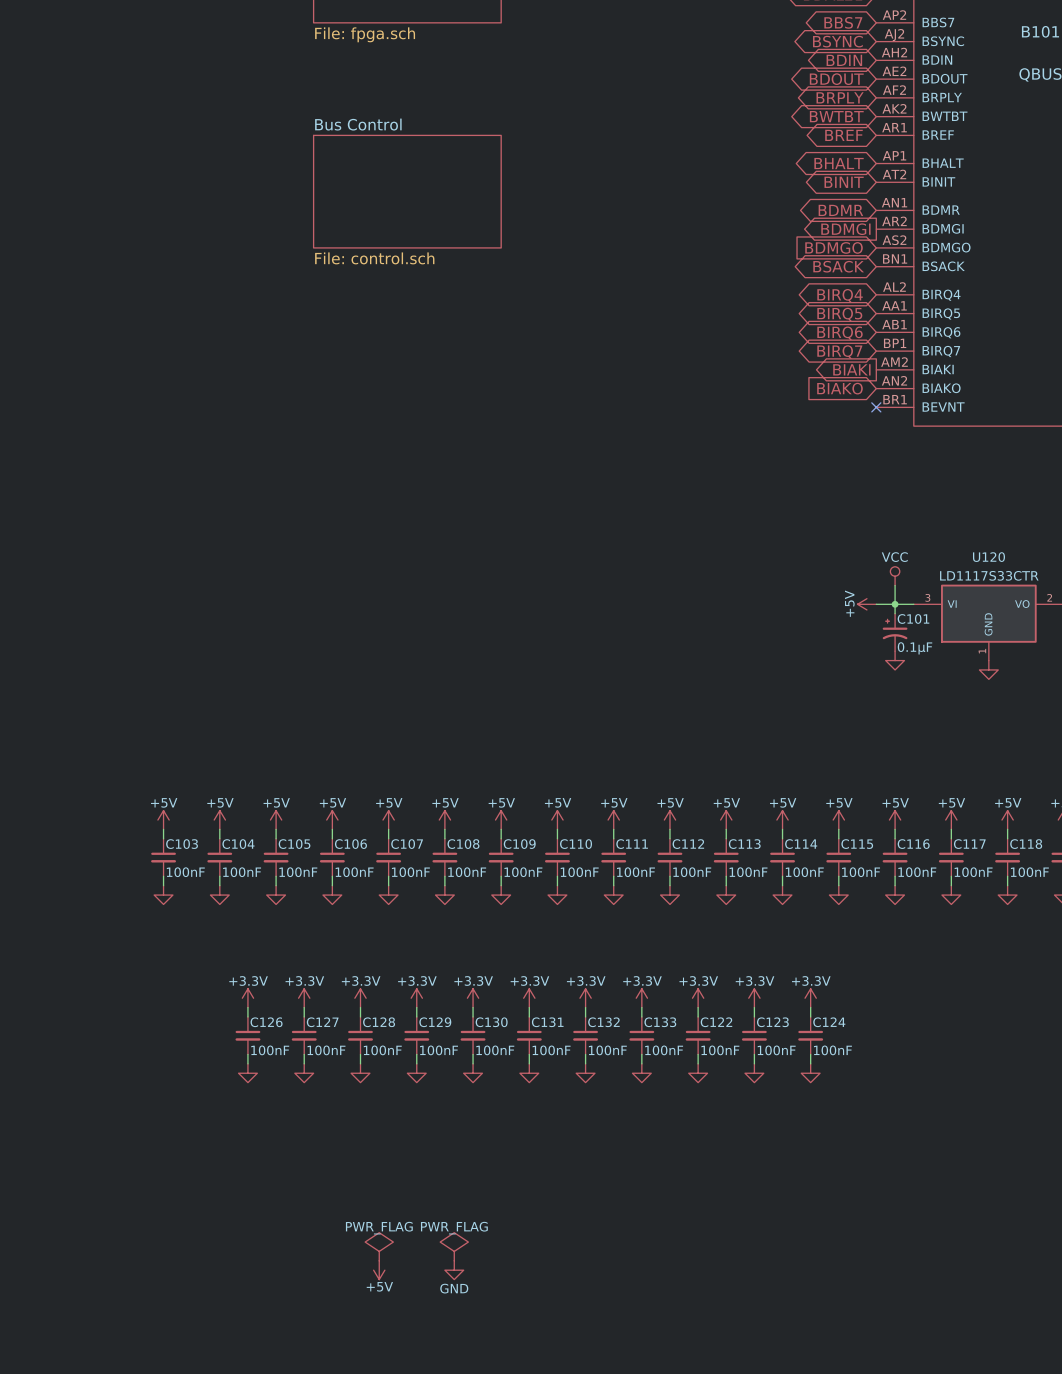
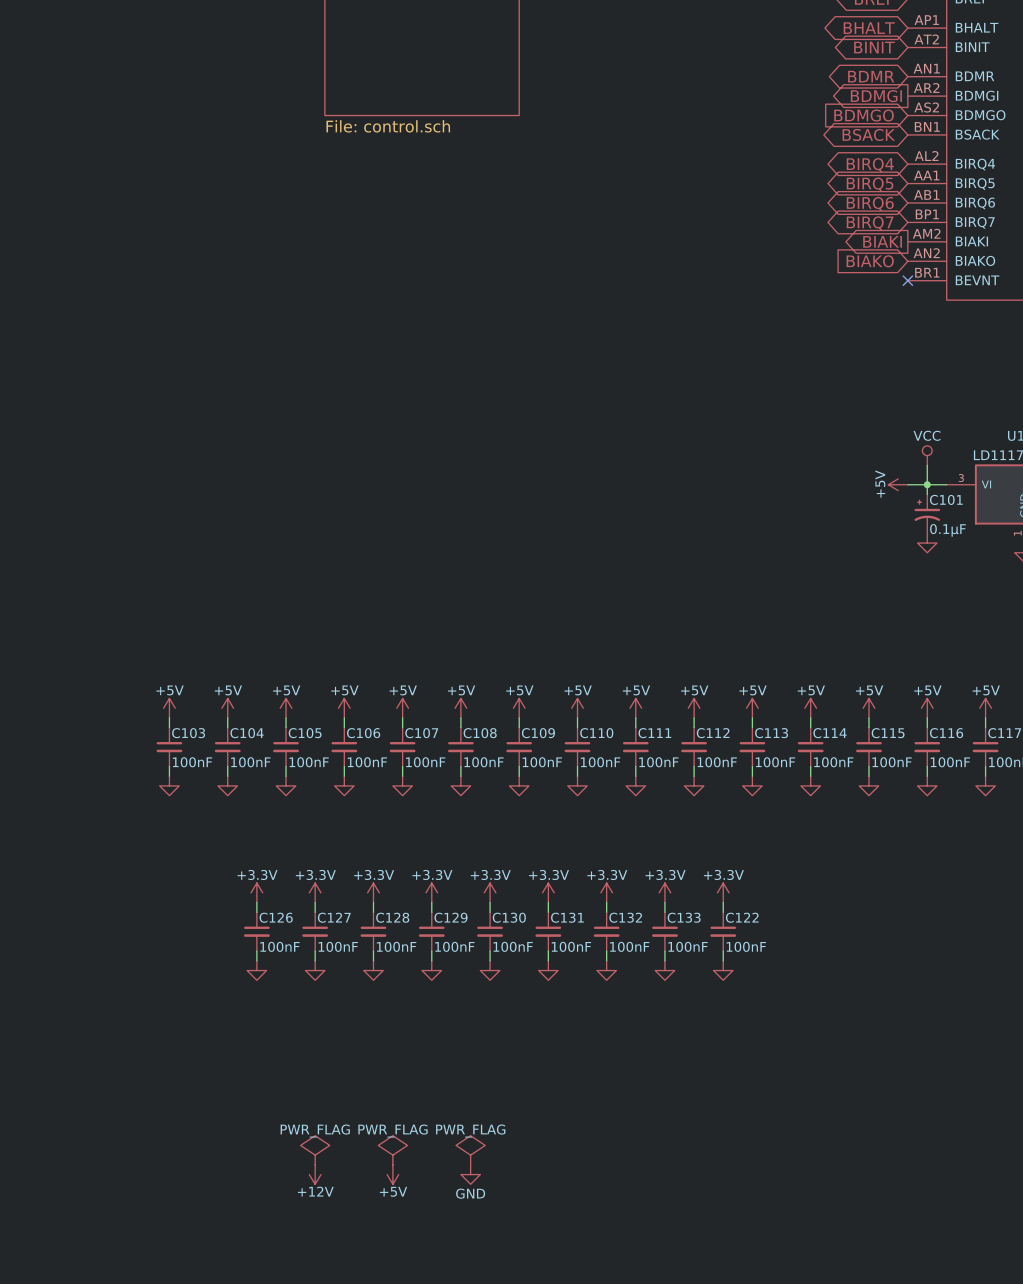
power symbol: +3.3V (754, 998) -> none
power symbol: +3.3V (810, 998) -> none
wire: (754, 1007) (754, 1016) -> none
wire: (810, 1007) (810, 1016) -> none
C123: 100nF (754, 1035) -> none
C124: 100nF (810, 1035) -> none
wire: (754, 1054) (754, 1063) -> none
wire: (810, 1054) (810, 1063) -> none
power symbol: (754, 1073) -> none
power symbol: (810, 1073) -> none
power symbol: none -> PWR_FLAG (315, 1150)
power symbol: none -> +12V (315, 1174)

